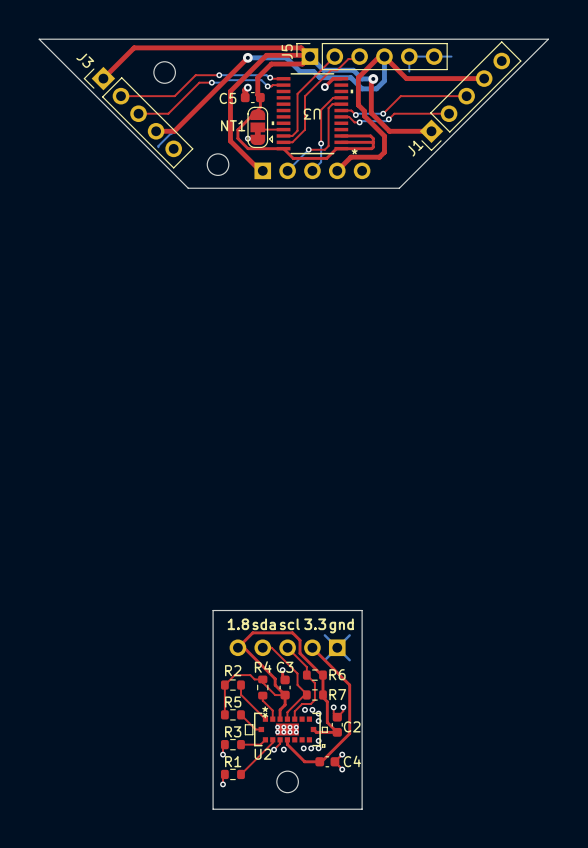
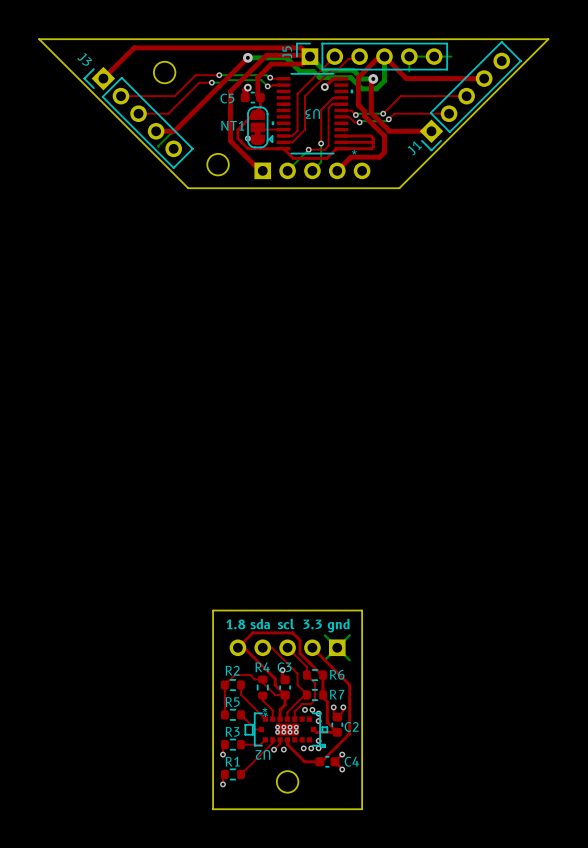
U2 name rotation: 0° (262, 754) -> 180° (263, 754)

